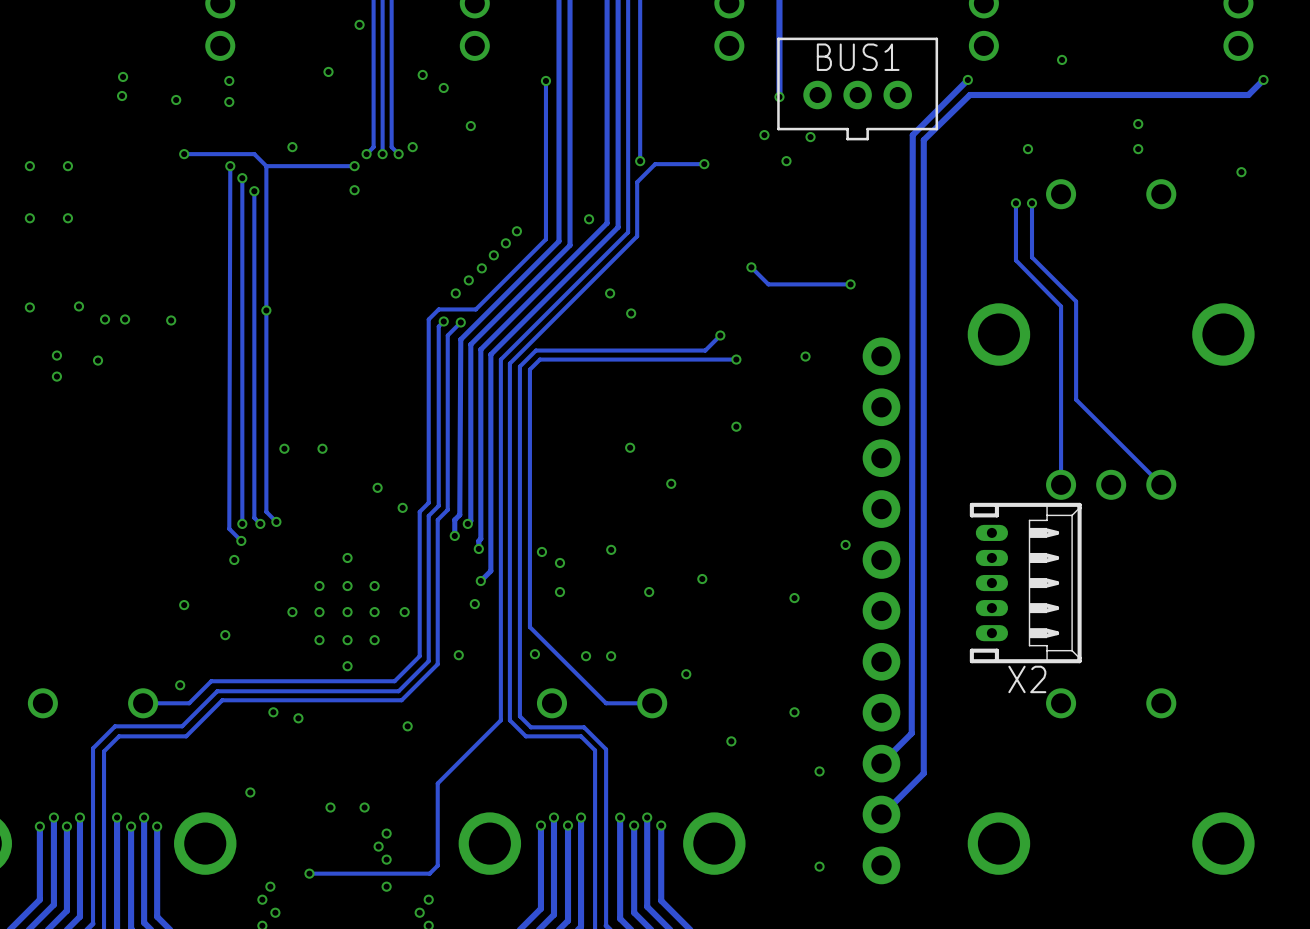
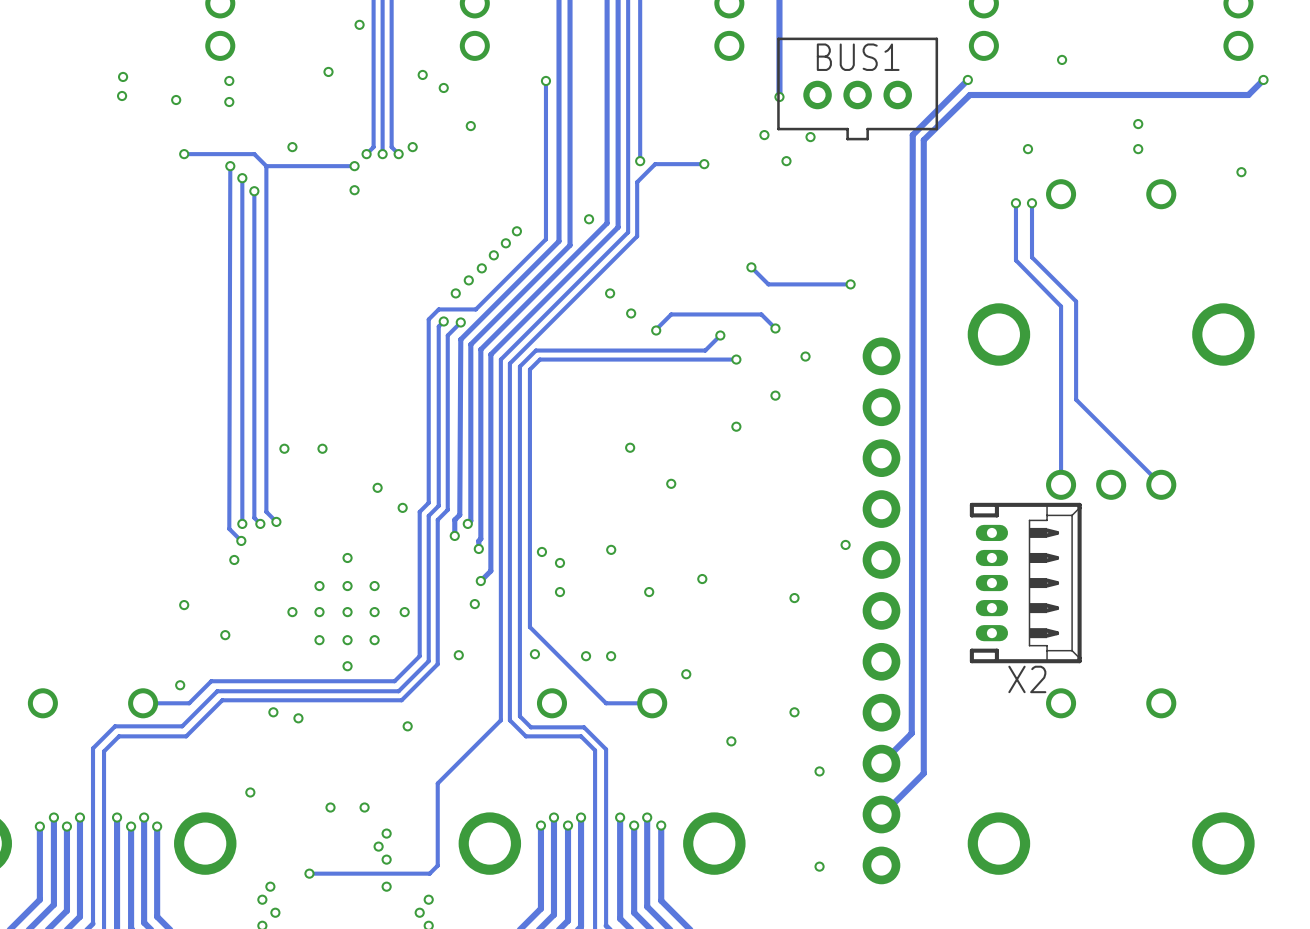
via: (29, 166) -> none
via: (67, 166) -> none
via: (29, 218) -> none
via: (67, 218) -> none
via: (78, 306) -> none
via: (29, 307) -> none
via: (266, 310) -> none
via: (105, 319) -> none
via: (125, 319) -> none
via: (171, 320) -> none
track: none -> (775, 328) (761, 314) (671, 314) (656, 330)
via: none -> (775, 328)
via: none -> (656, 330)
via: (56, 355) -> none
via: (98, 360) -> none
via: (56, 376) -> none
via: none -> (775, 395)

